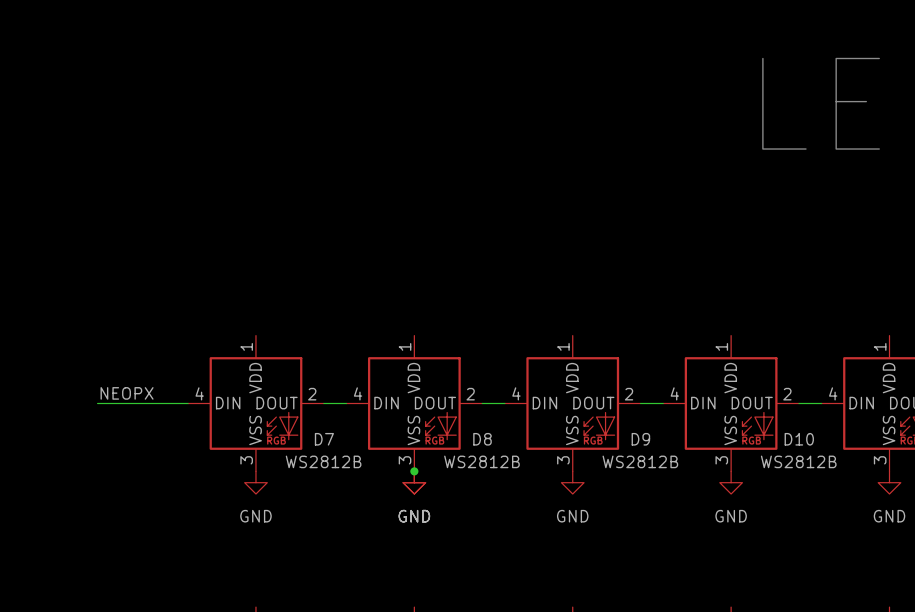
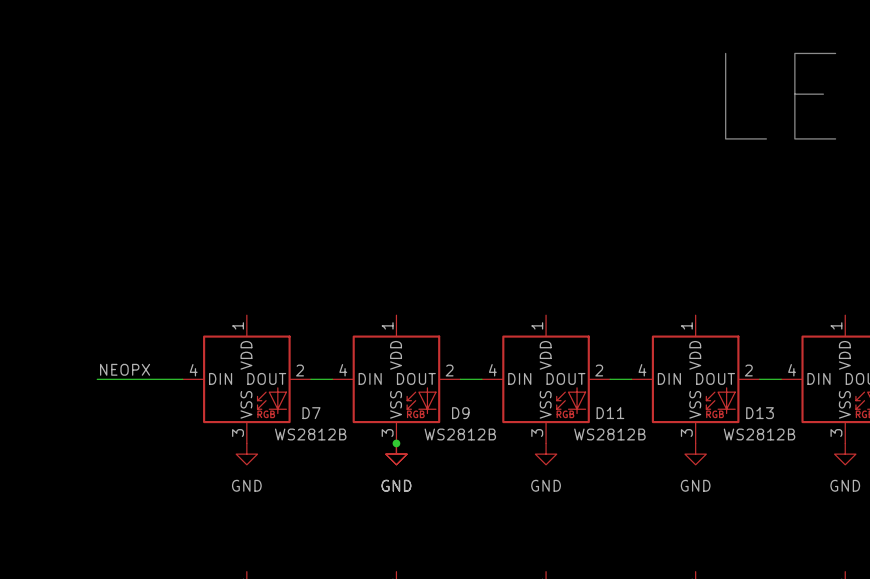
D8 name: D8 (482, 439) -> D9 (460, 413)
D9 name: D9 (640, 439) -> D11 (610, 413)
D10 name: D10 (799, 439) -> D13 (760, 413)

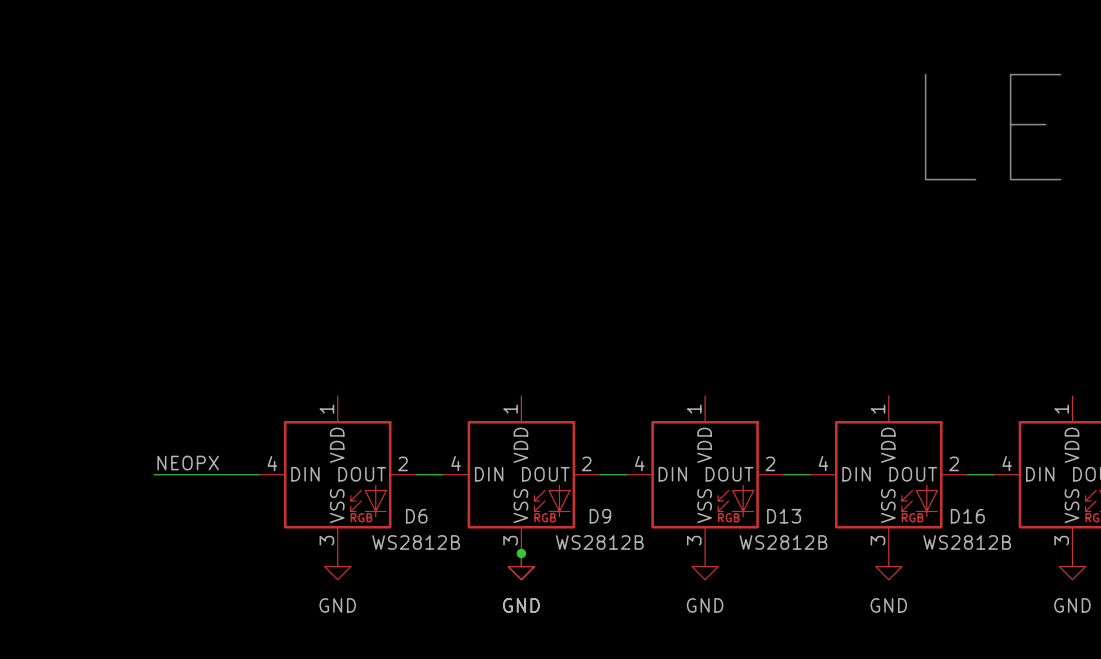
D7 name: D7 (311, 413) -> D6 (416, 516)
D11 name: D11 (610, 413) -> D13 (784, 516)
D13 name: D13 (760, 413) -> D16 (967, 516)

